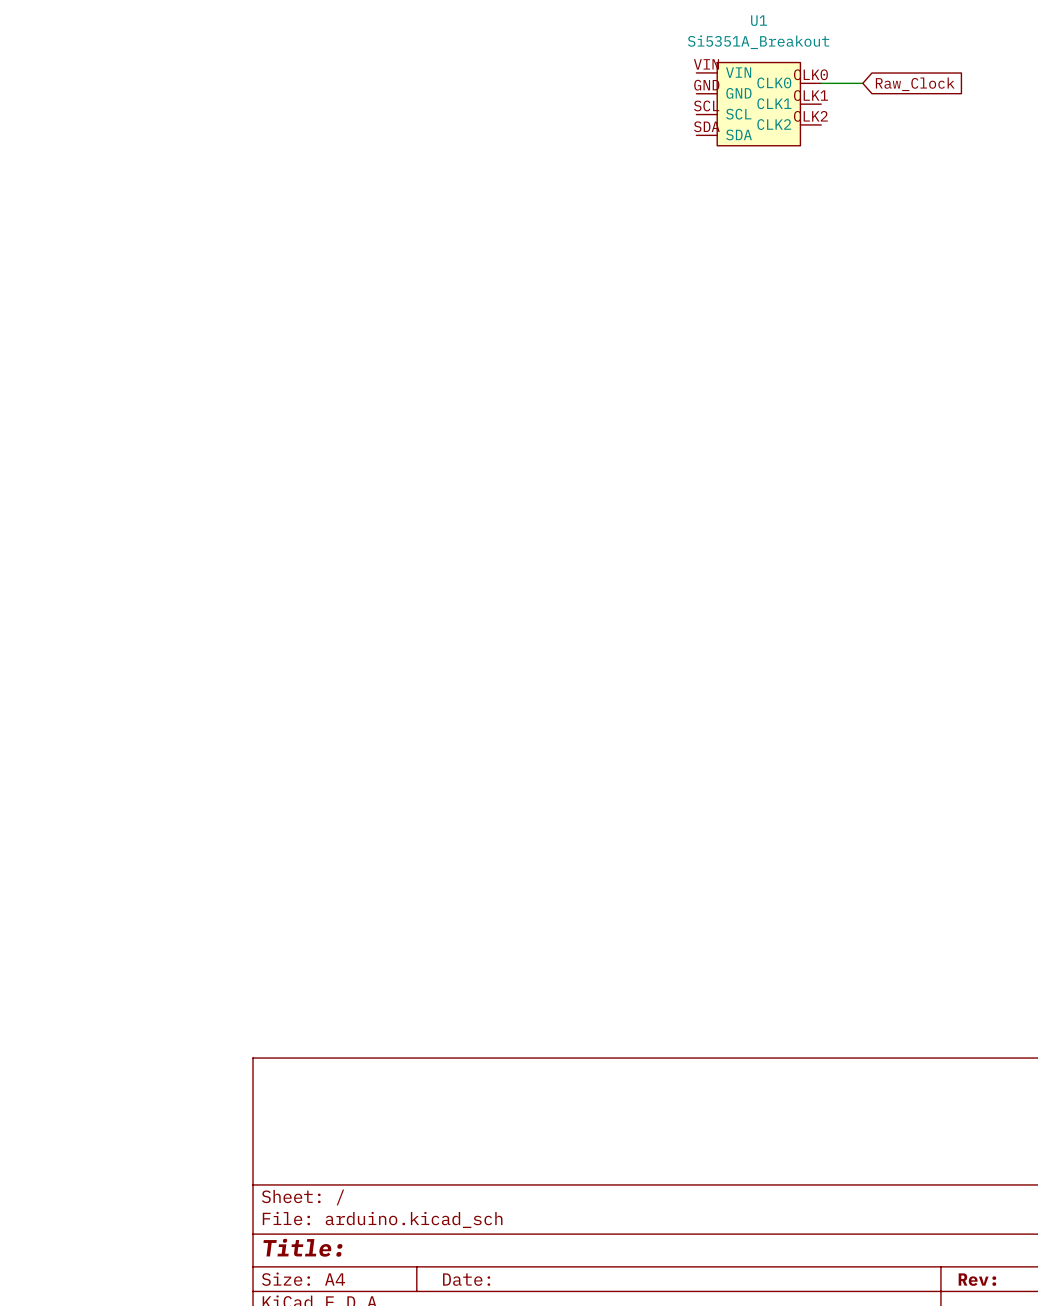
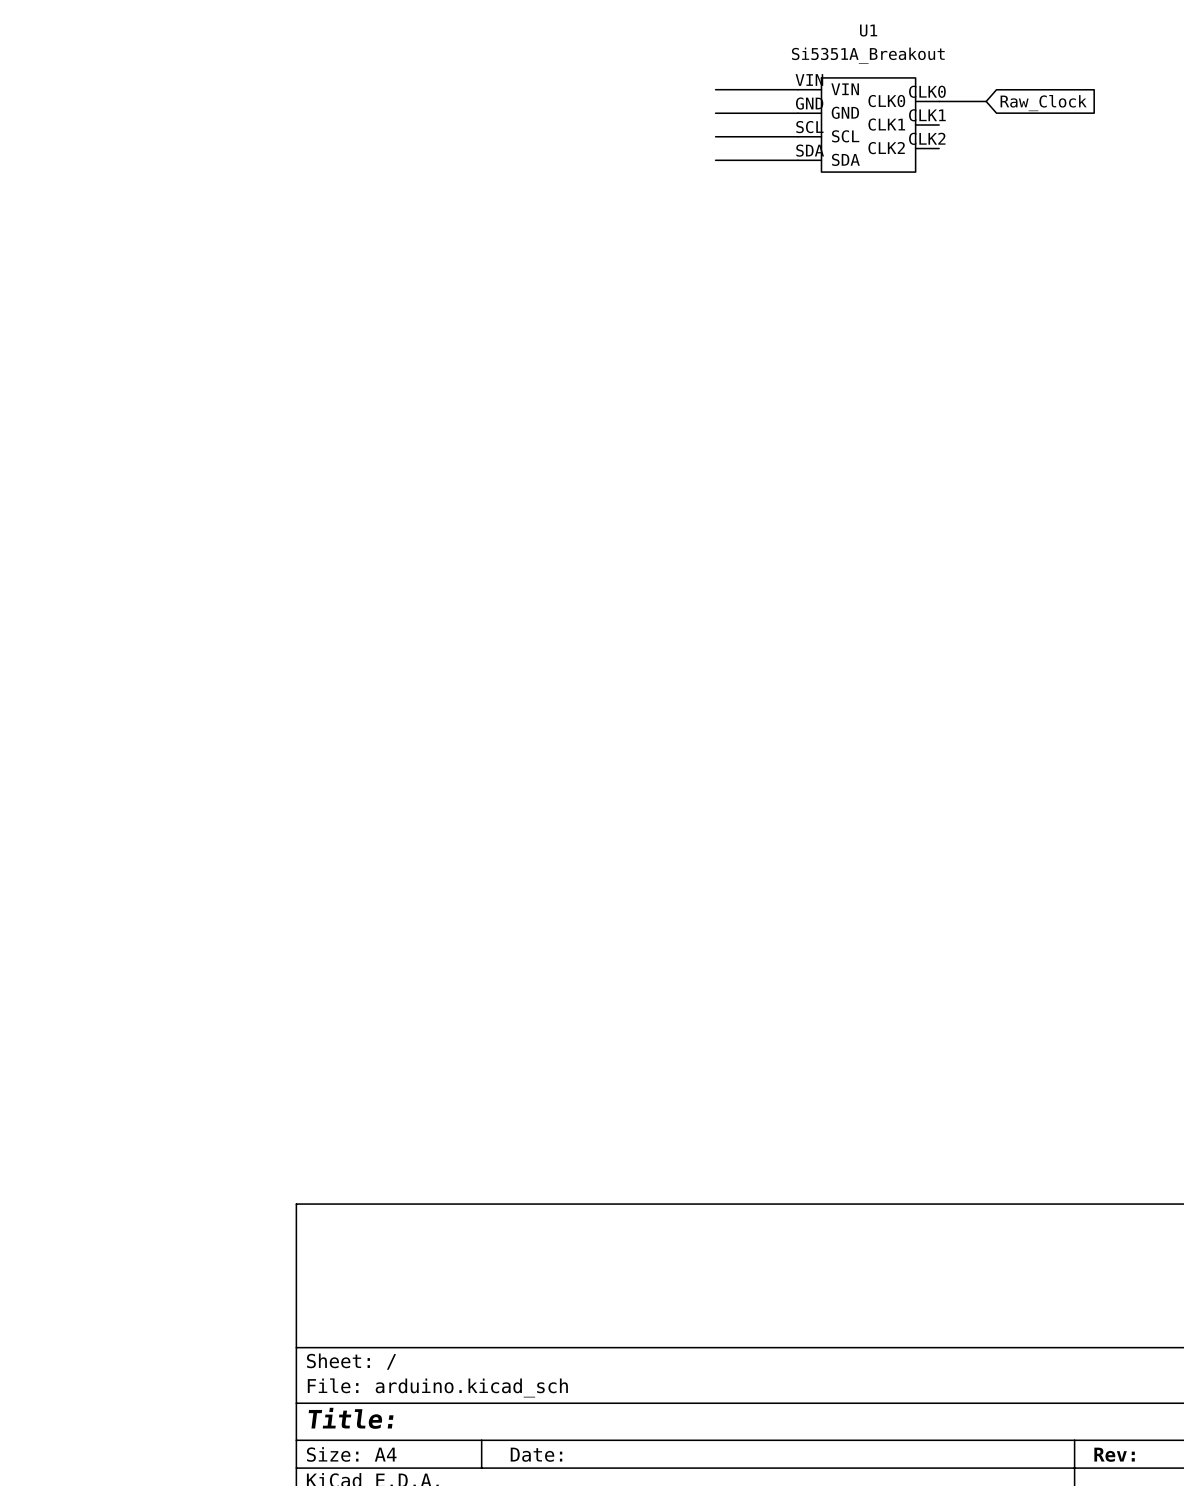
wire: none -> (715, 89) (797, 89)
wire: none -> (715, 113) (797, 113)
wire: none -> (715, 136) (797, 136)
wire: none -> (715, 160) (797, 160)

